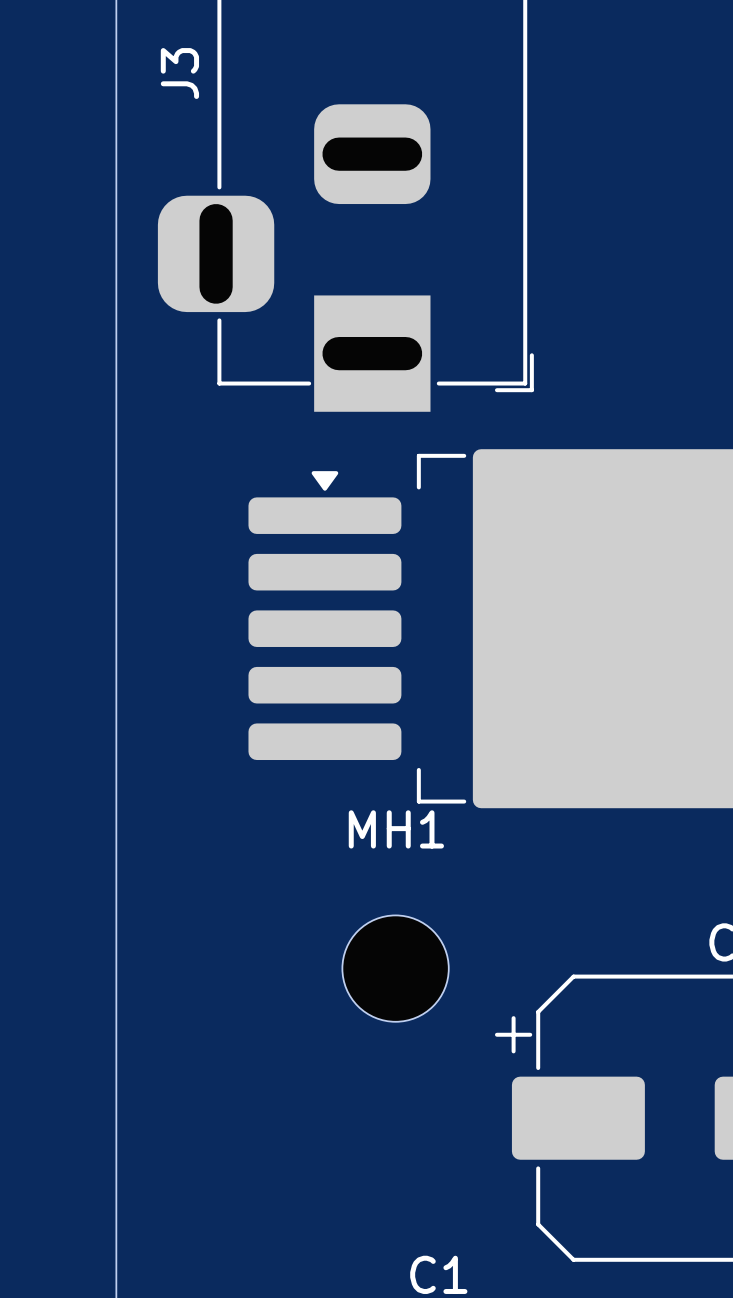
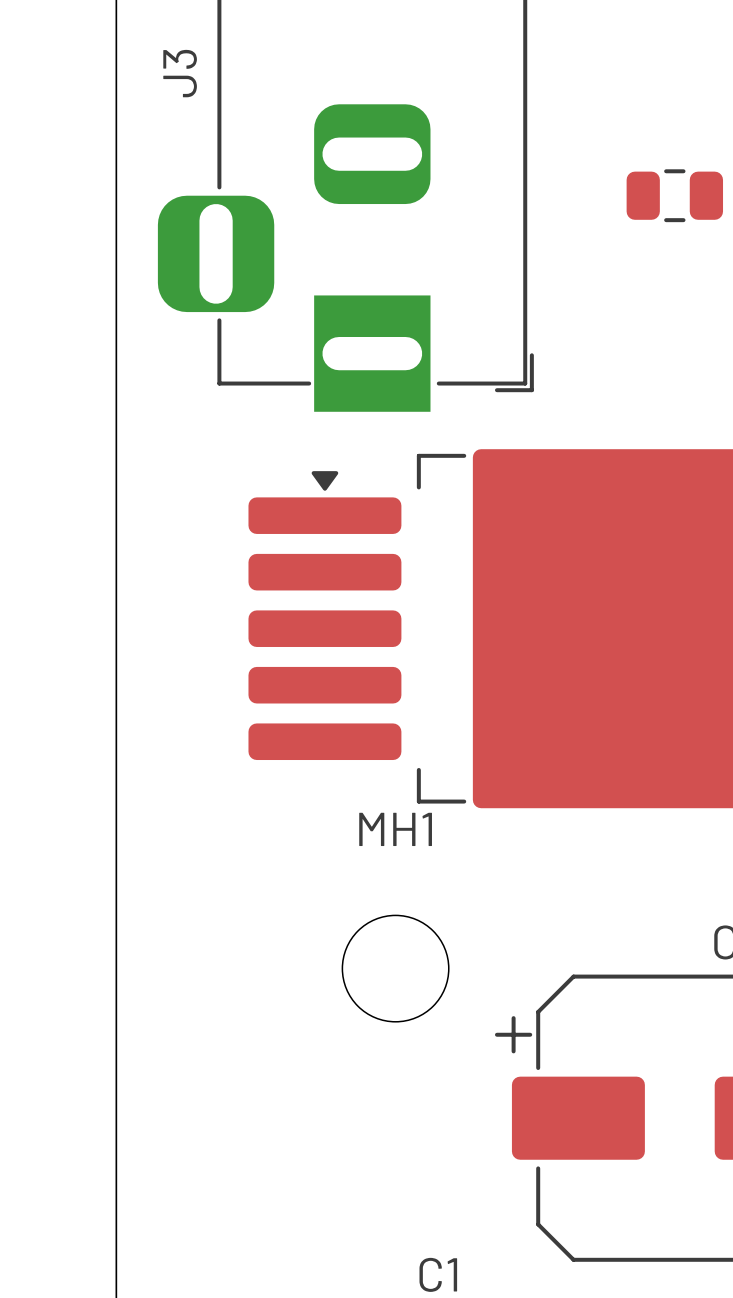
part: none -> (674, 195)

